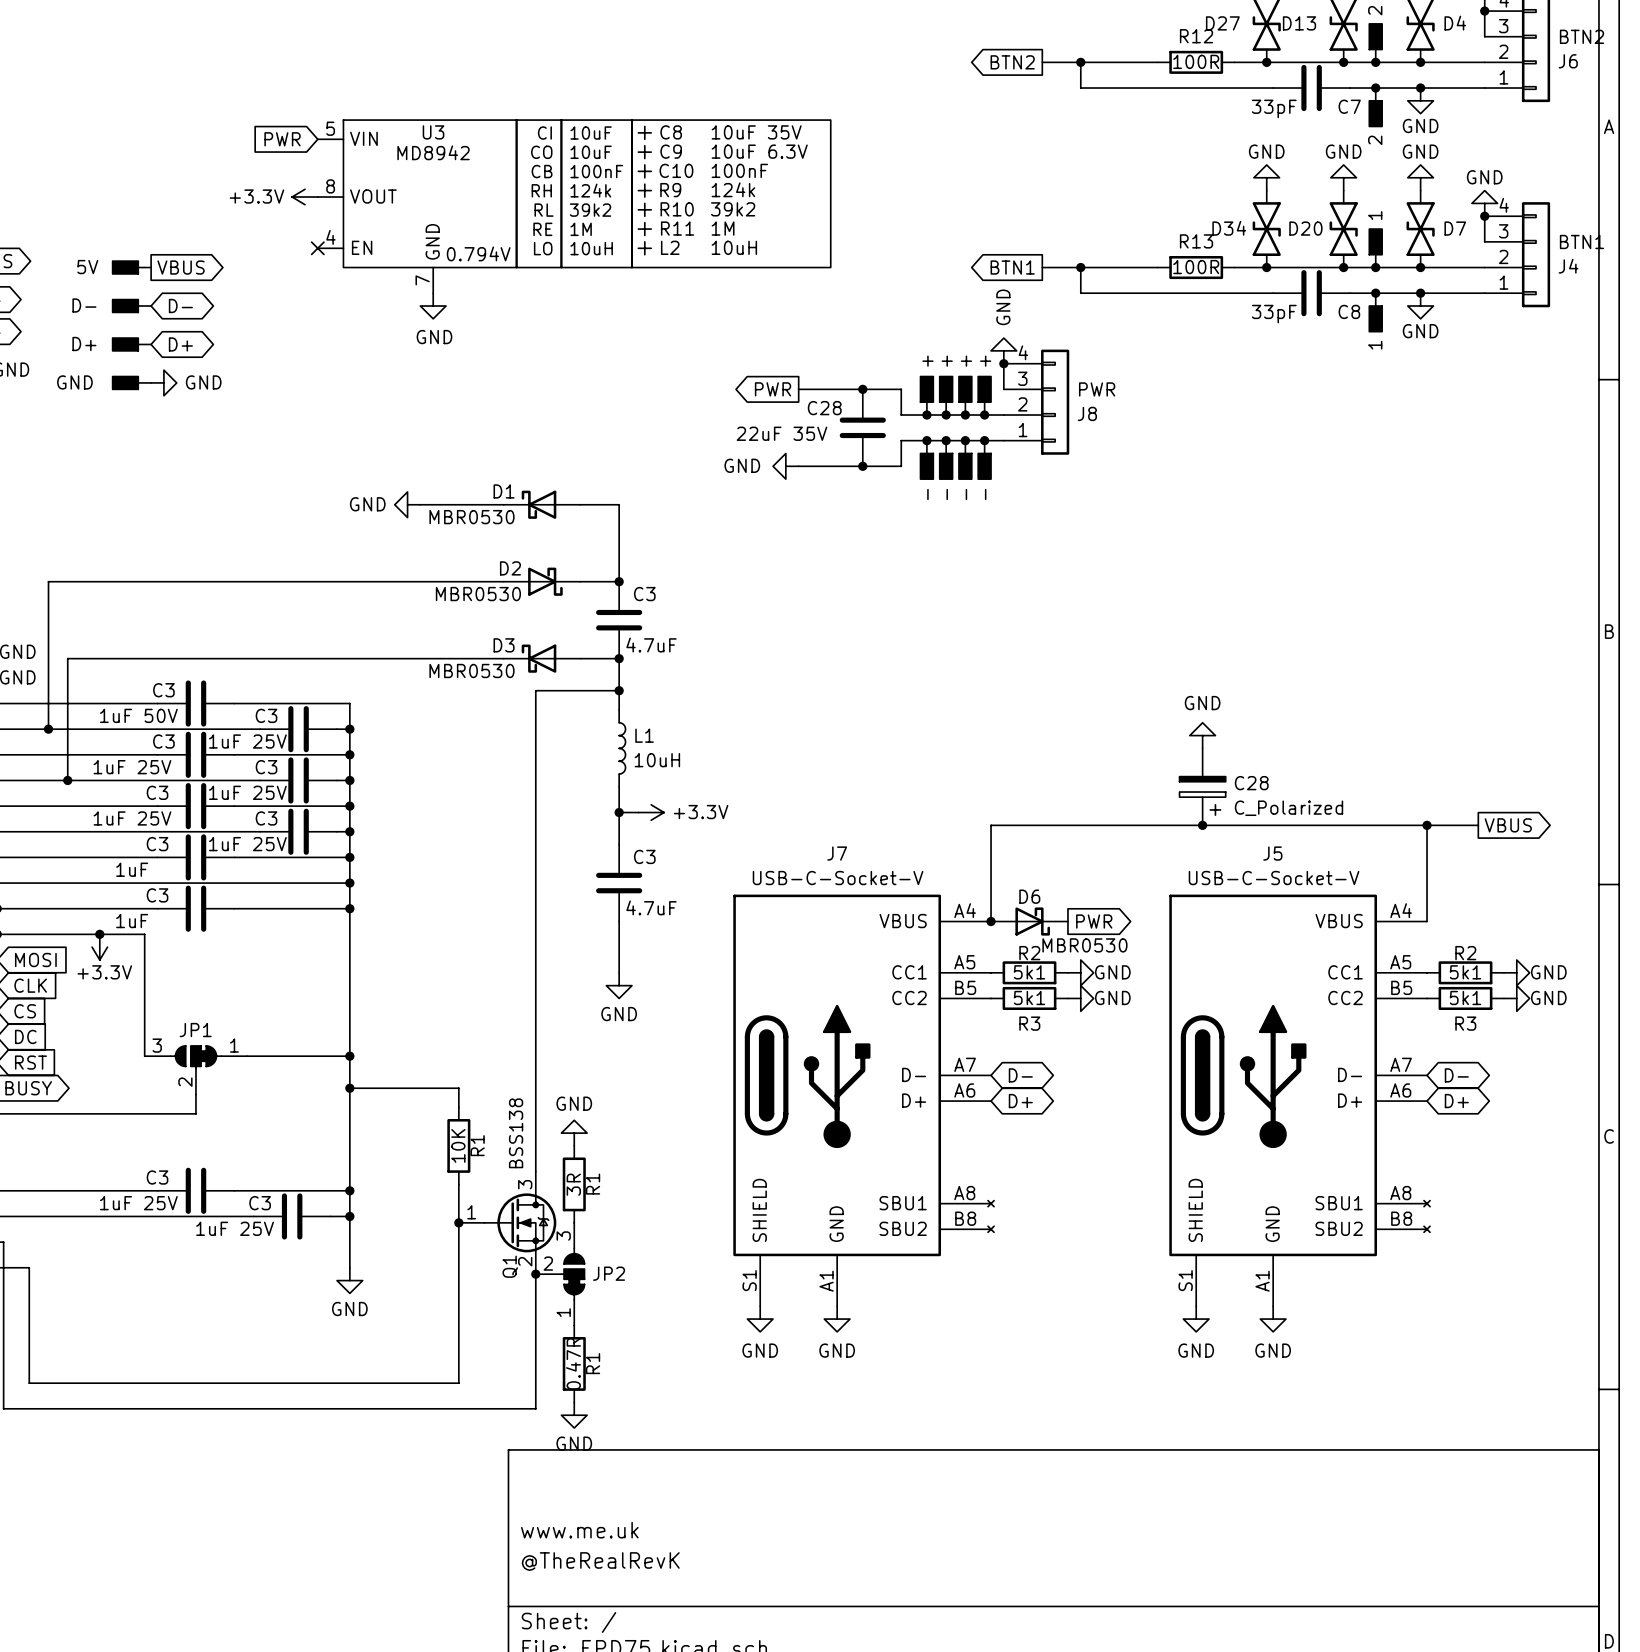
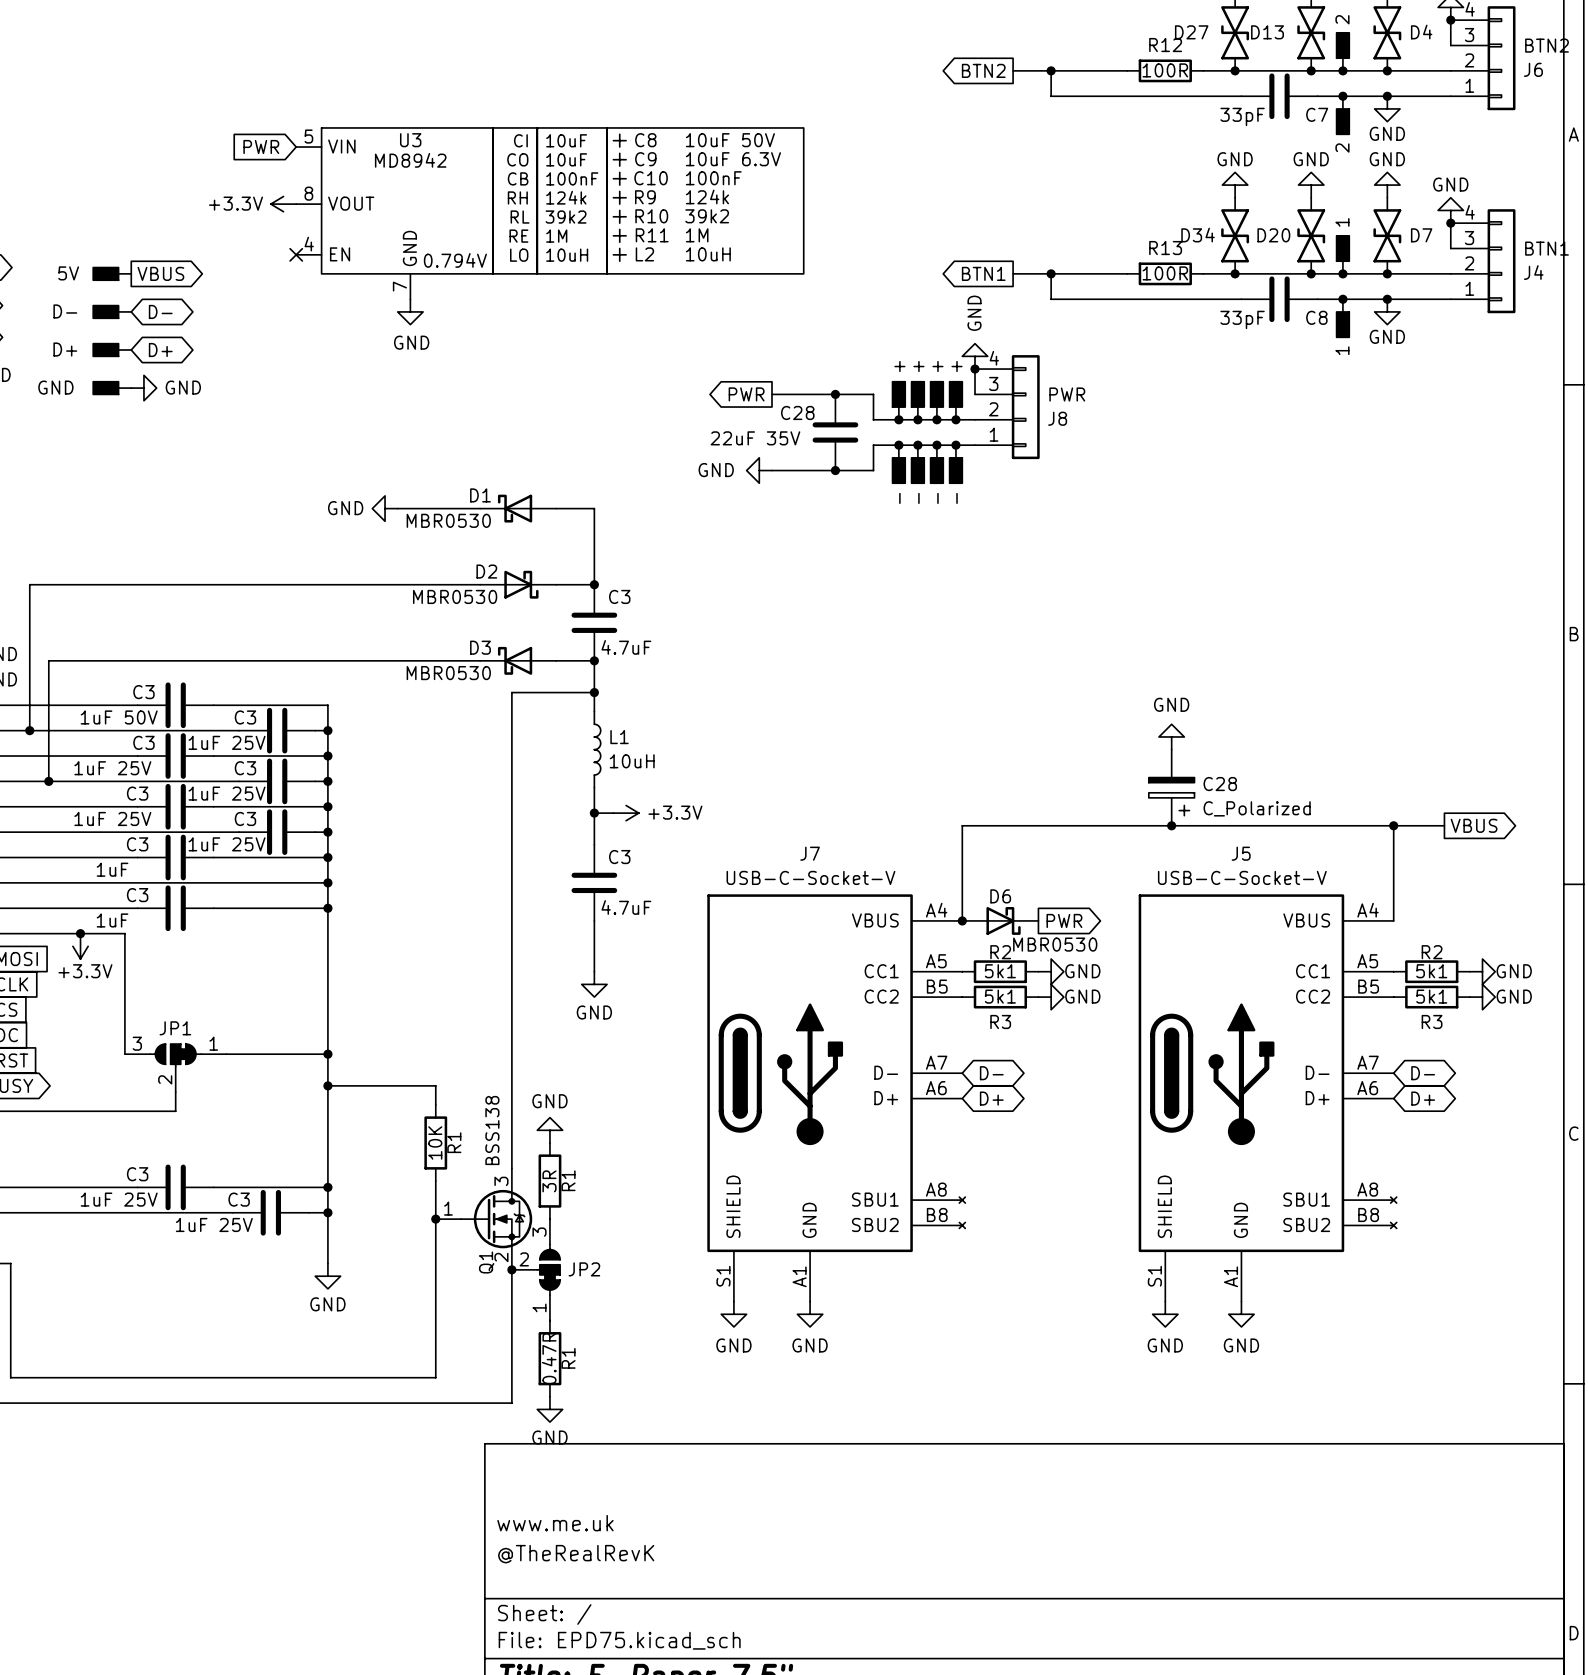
C8 value: 10uF 35V (756, 132) -> 10uF 50V (730, 140)

